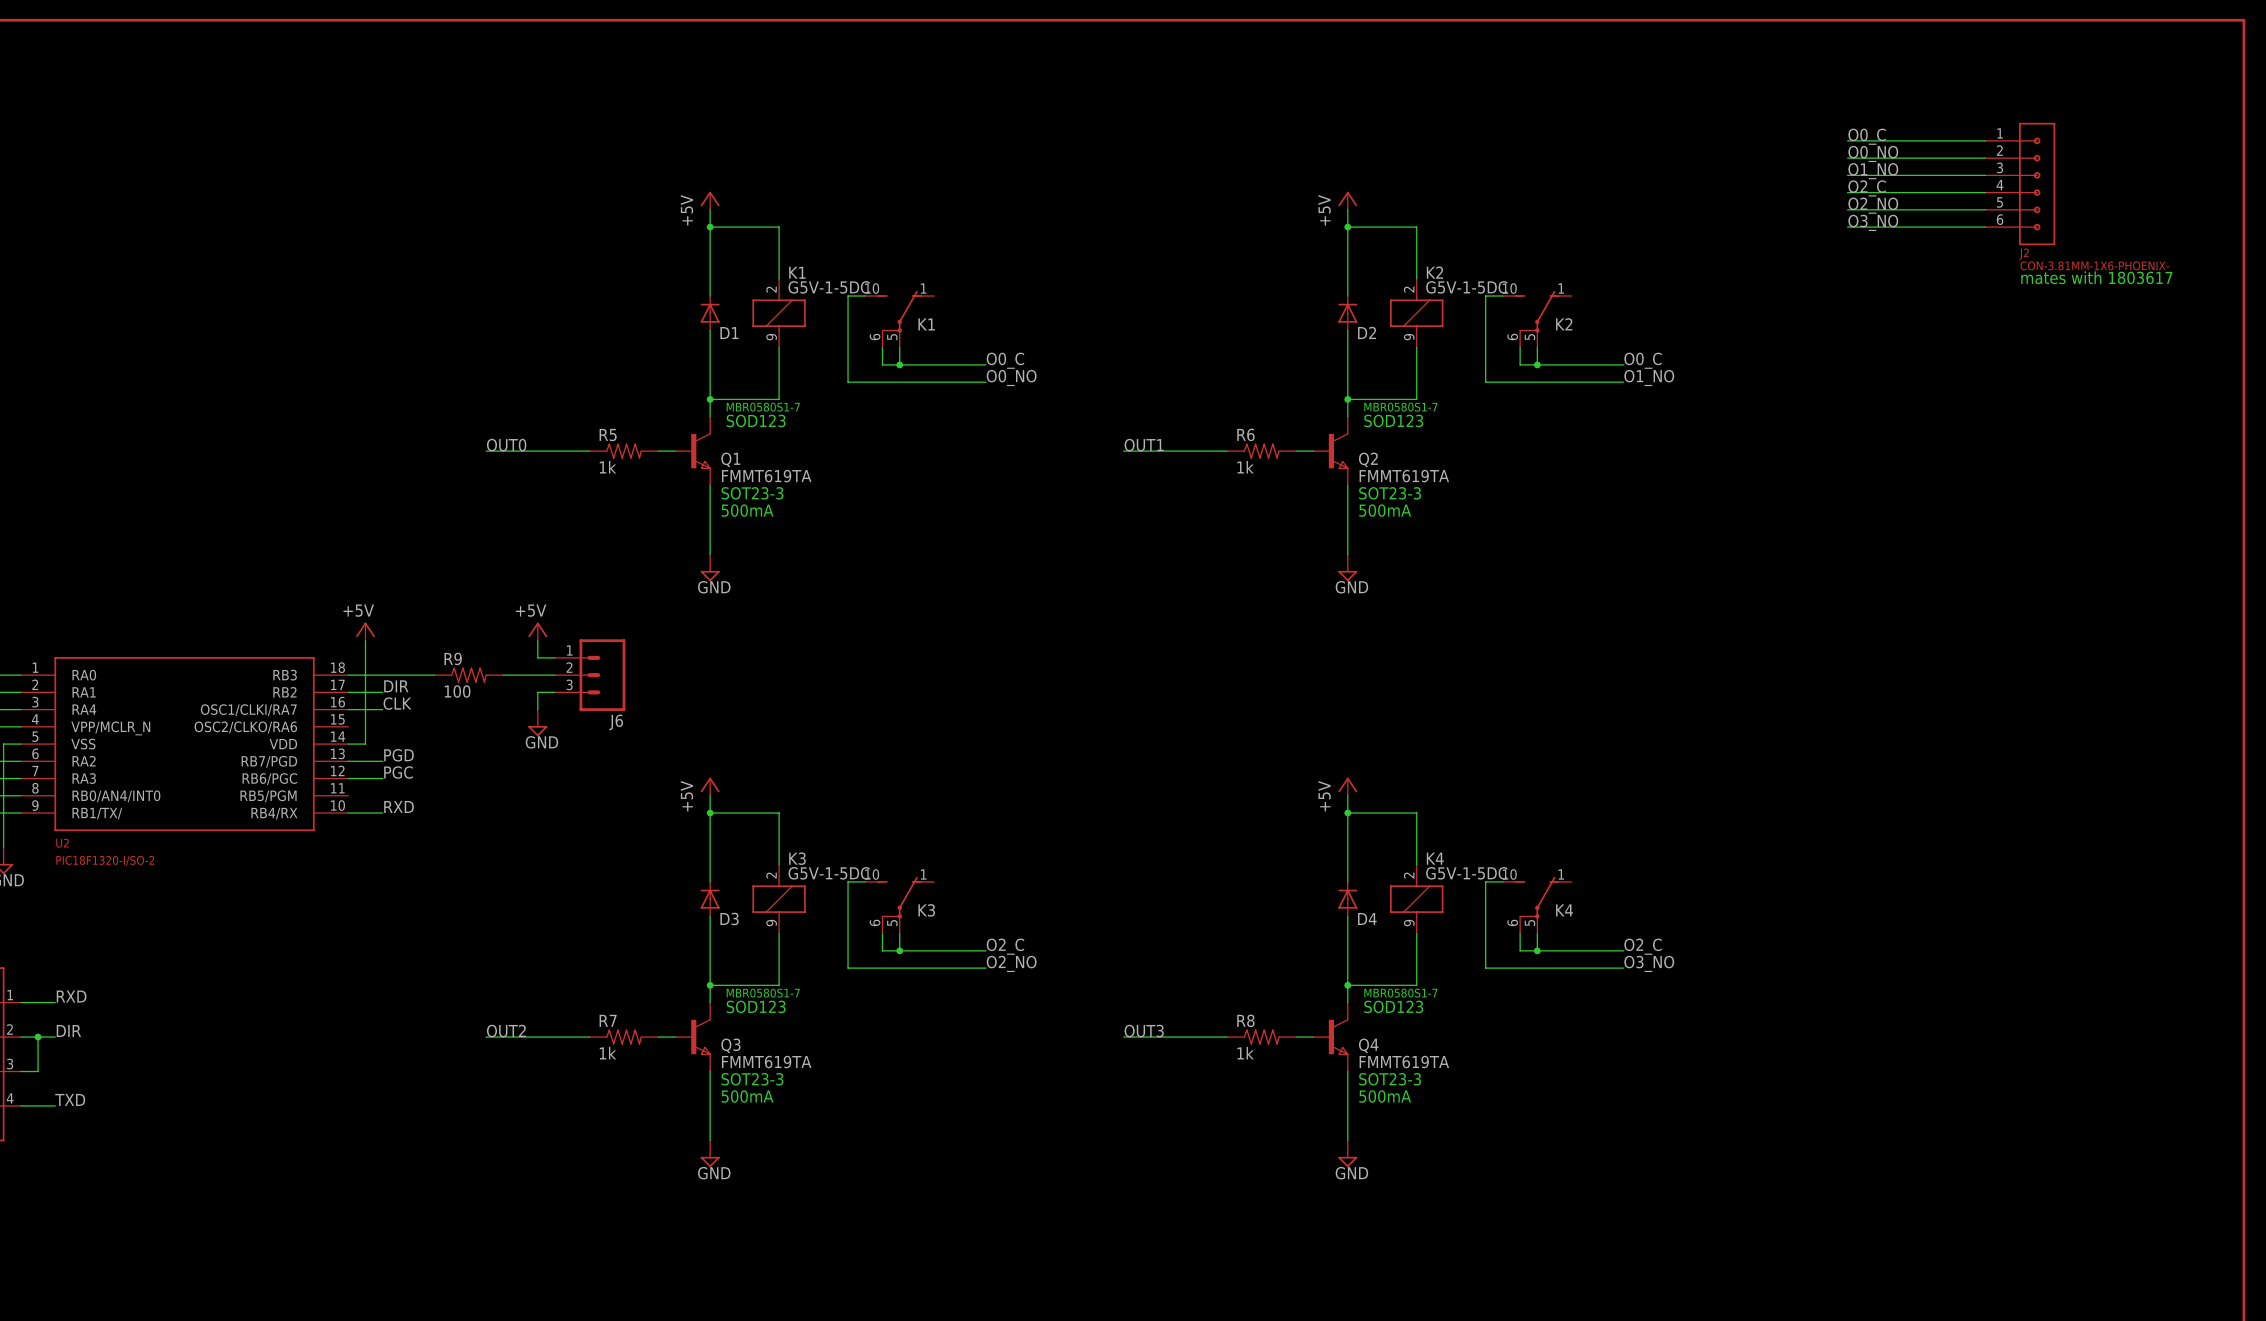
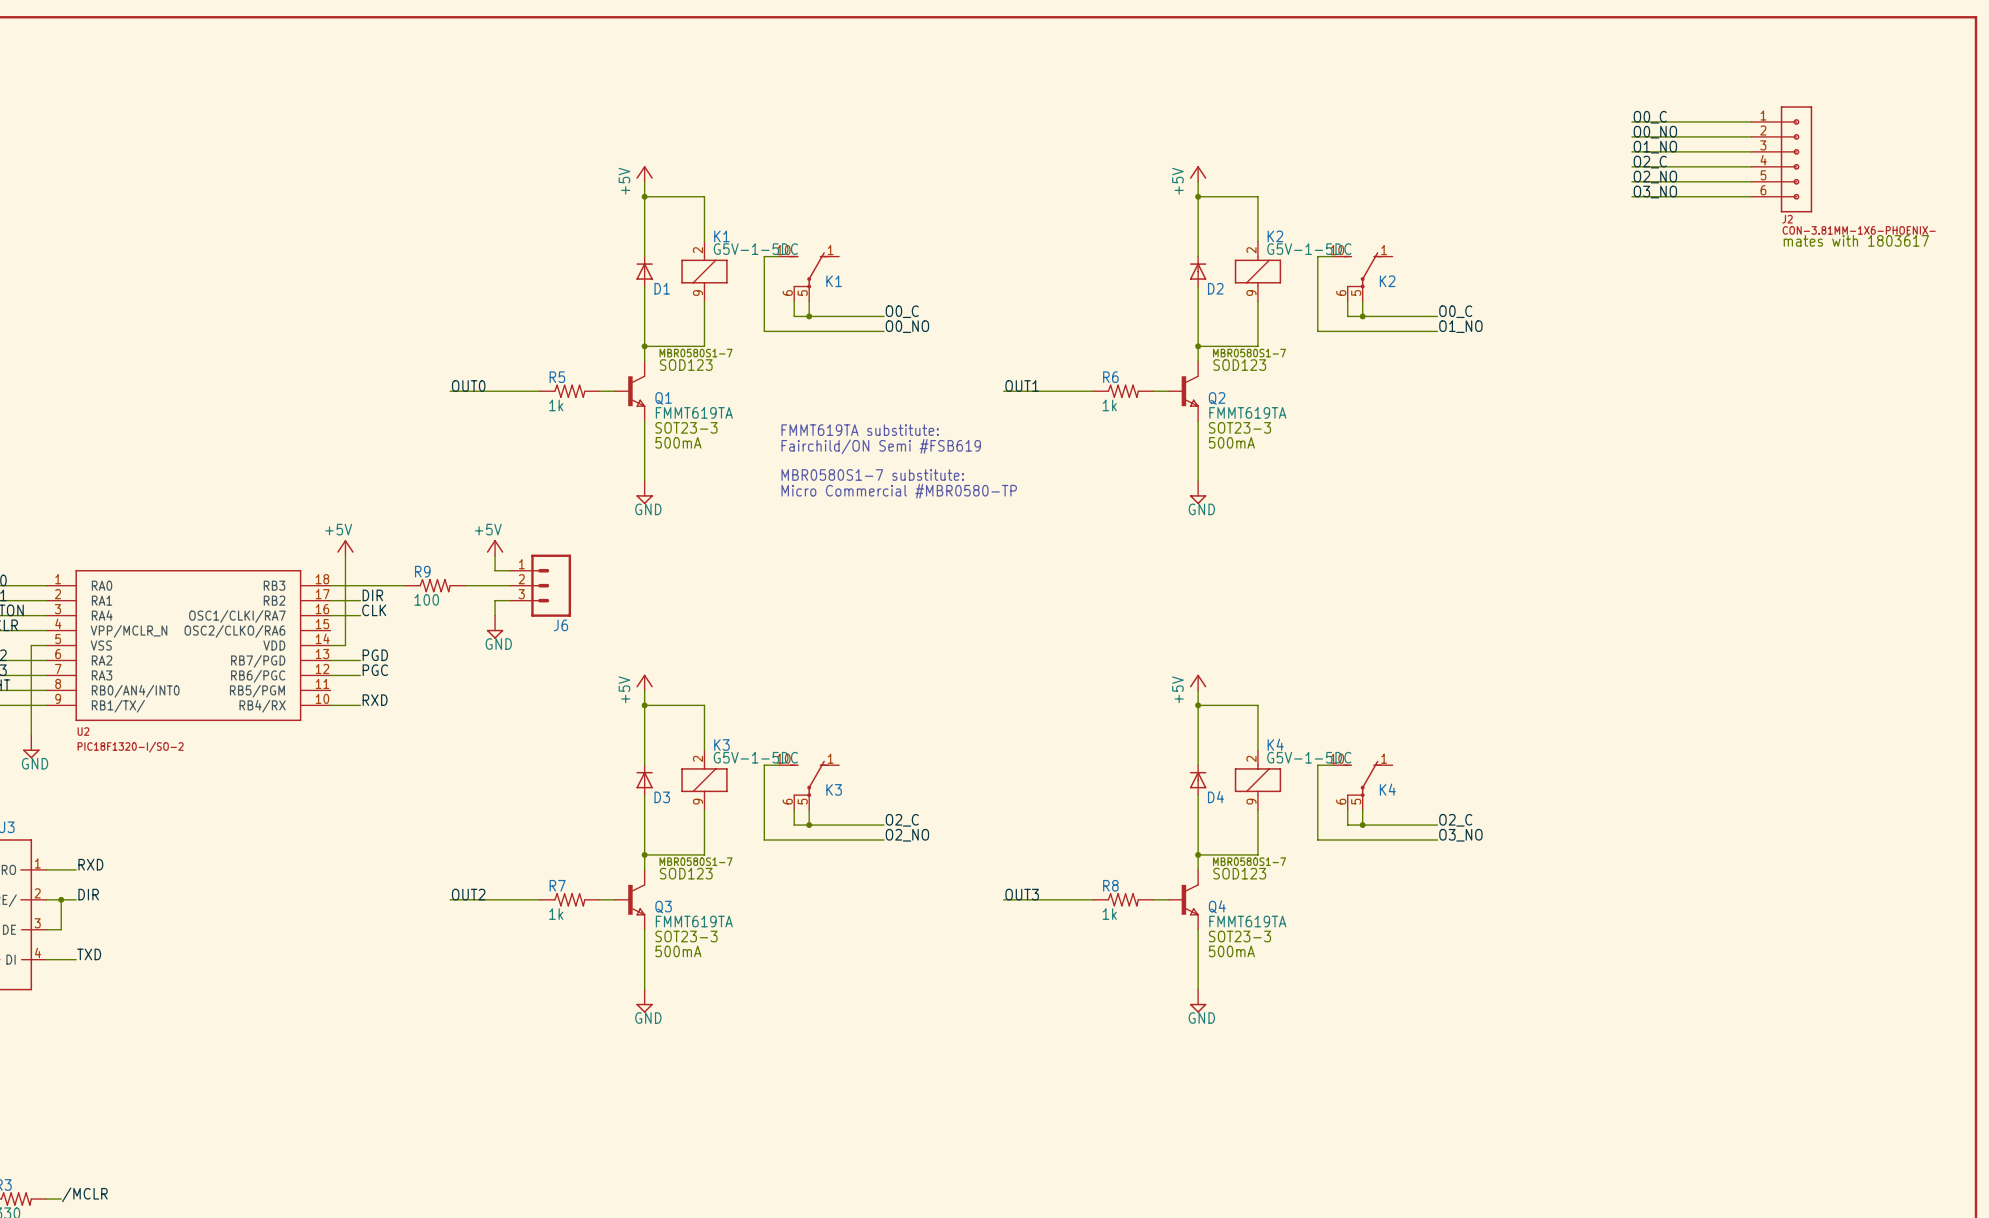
text: none -> FMMT619TA substitute: (860, 430)
text: none -> Fairchild/ON Semi #FSB619 (881, 446)
text: none -> MBR0580S1-7 substitute: (872, 475)
text: none -> Micro Commercial #MBR0580-TP (899, 491)

